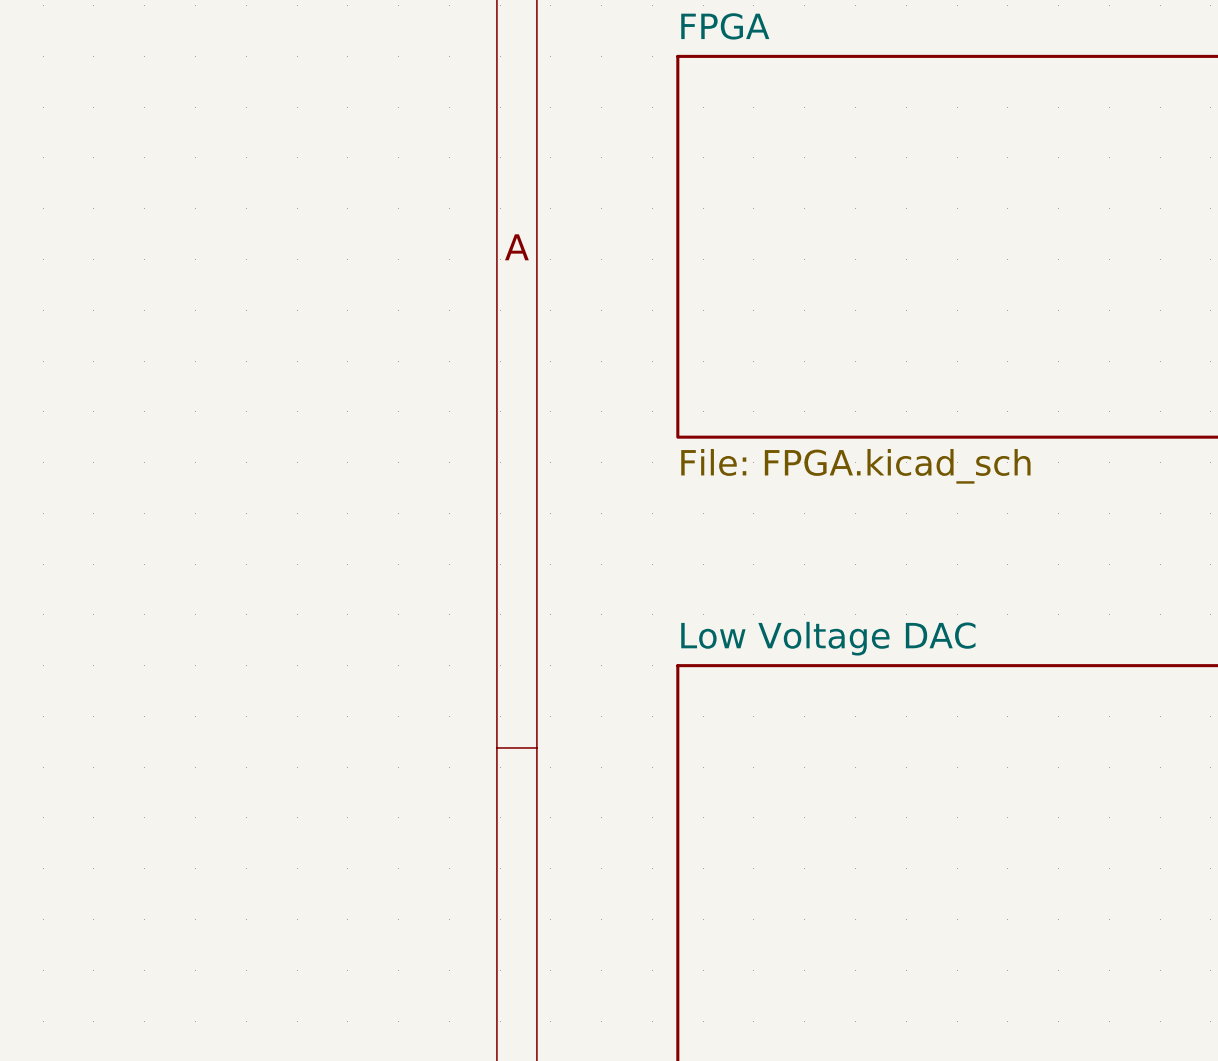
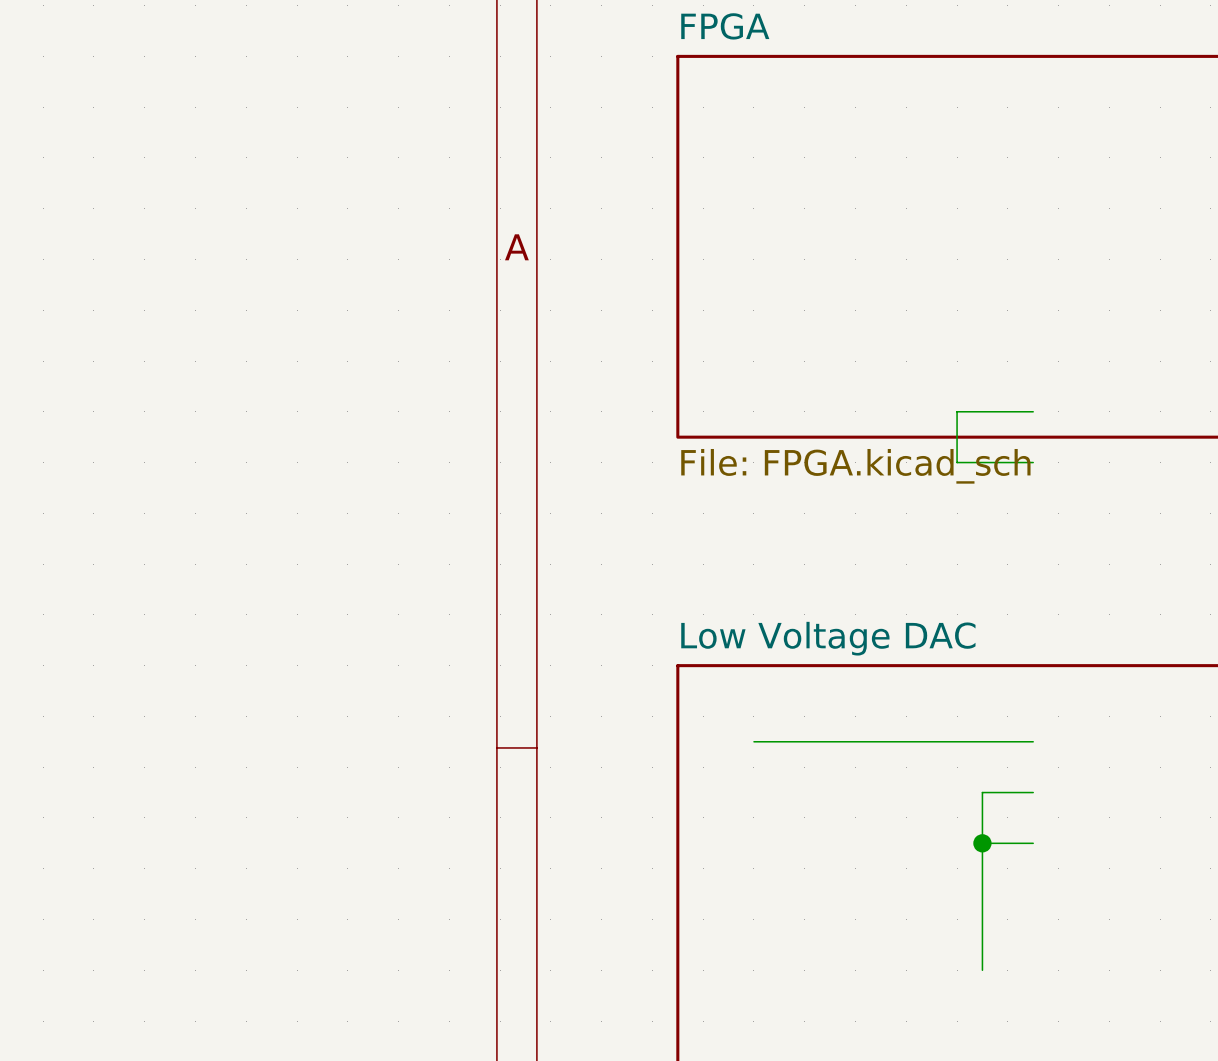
wire: none -> (1033, 411) (957, 411) (957, 462) (1033, 462)
wire: none -> (753, 741) (1033, 741)
wire: none -> (1033, 792) (982, 792) (982, 970)
wire: none -> (982, 843) (1033, 843)
junction: none -> (982, 843)

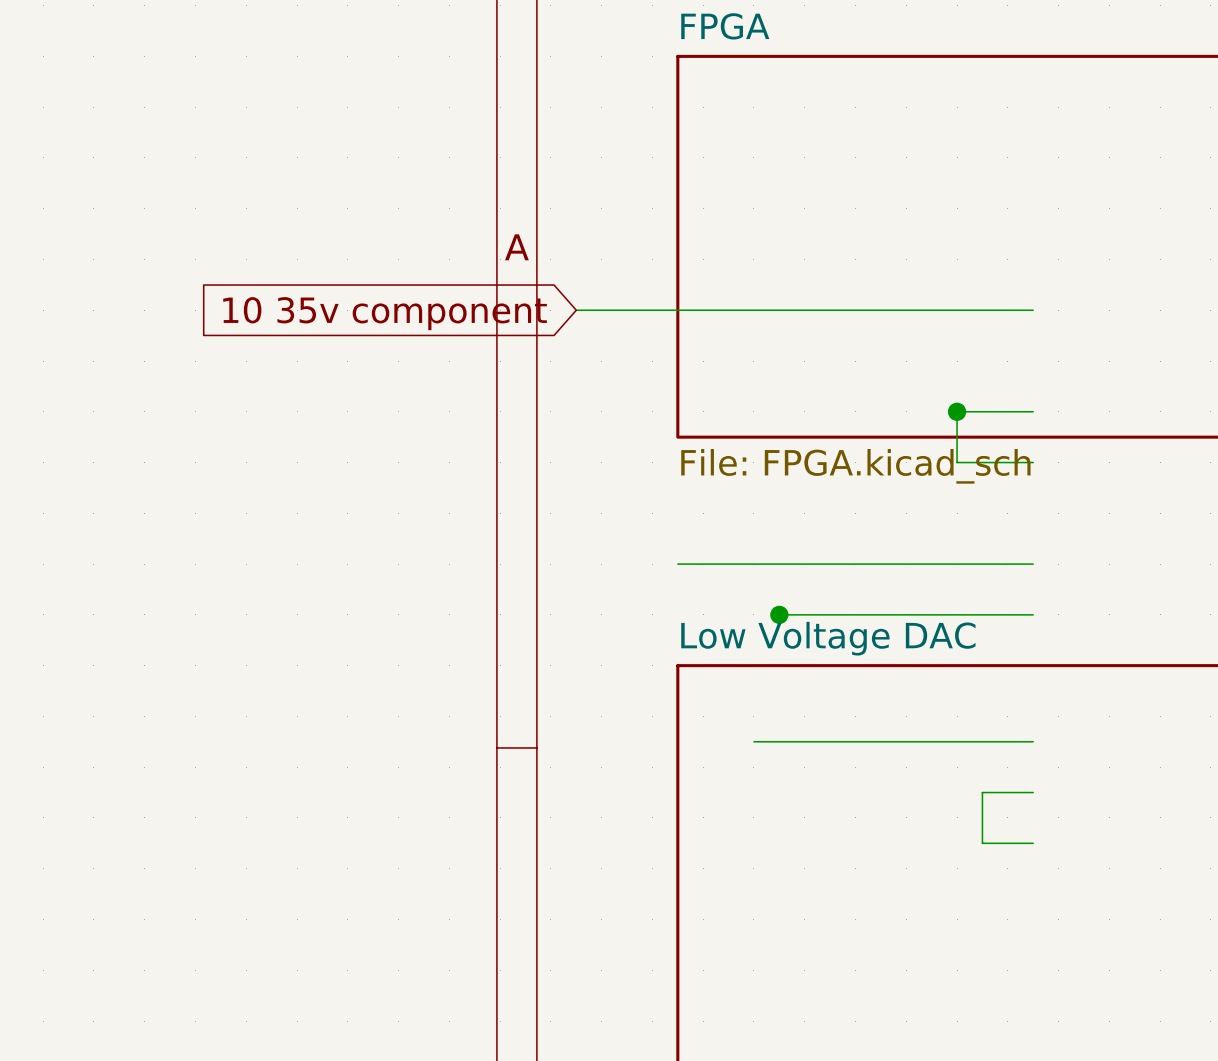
wire: none -> (576, 310) (1033, 310)
global label: none -> 10 35v component (385, 313)
junction: none -> (957, 411)
wire: none -> (677, 564) (1033, 564)
wire: none -> (779, 614) (1033, 614)
junction: none -> (779, 614)
wire: (982, 843) (982, 970) -> none
junction: (982, 843) -> none

